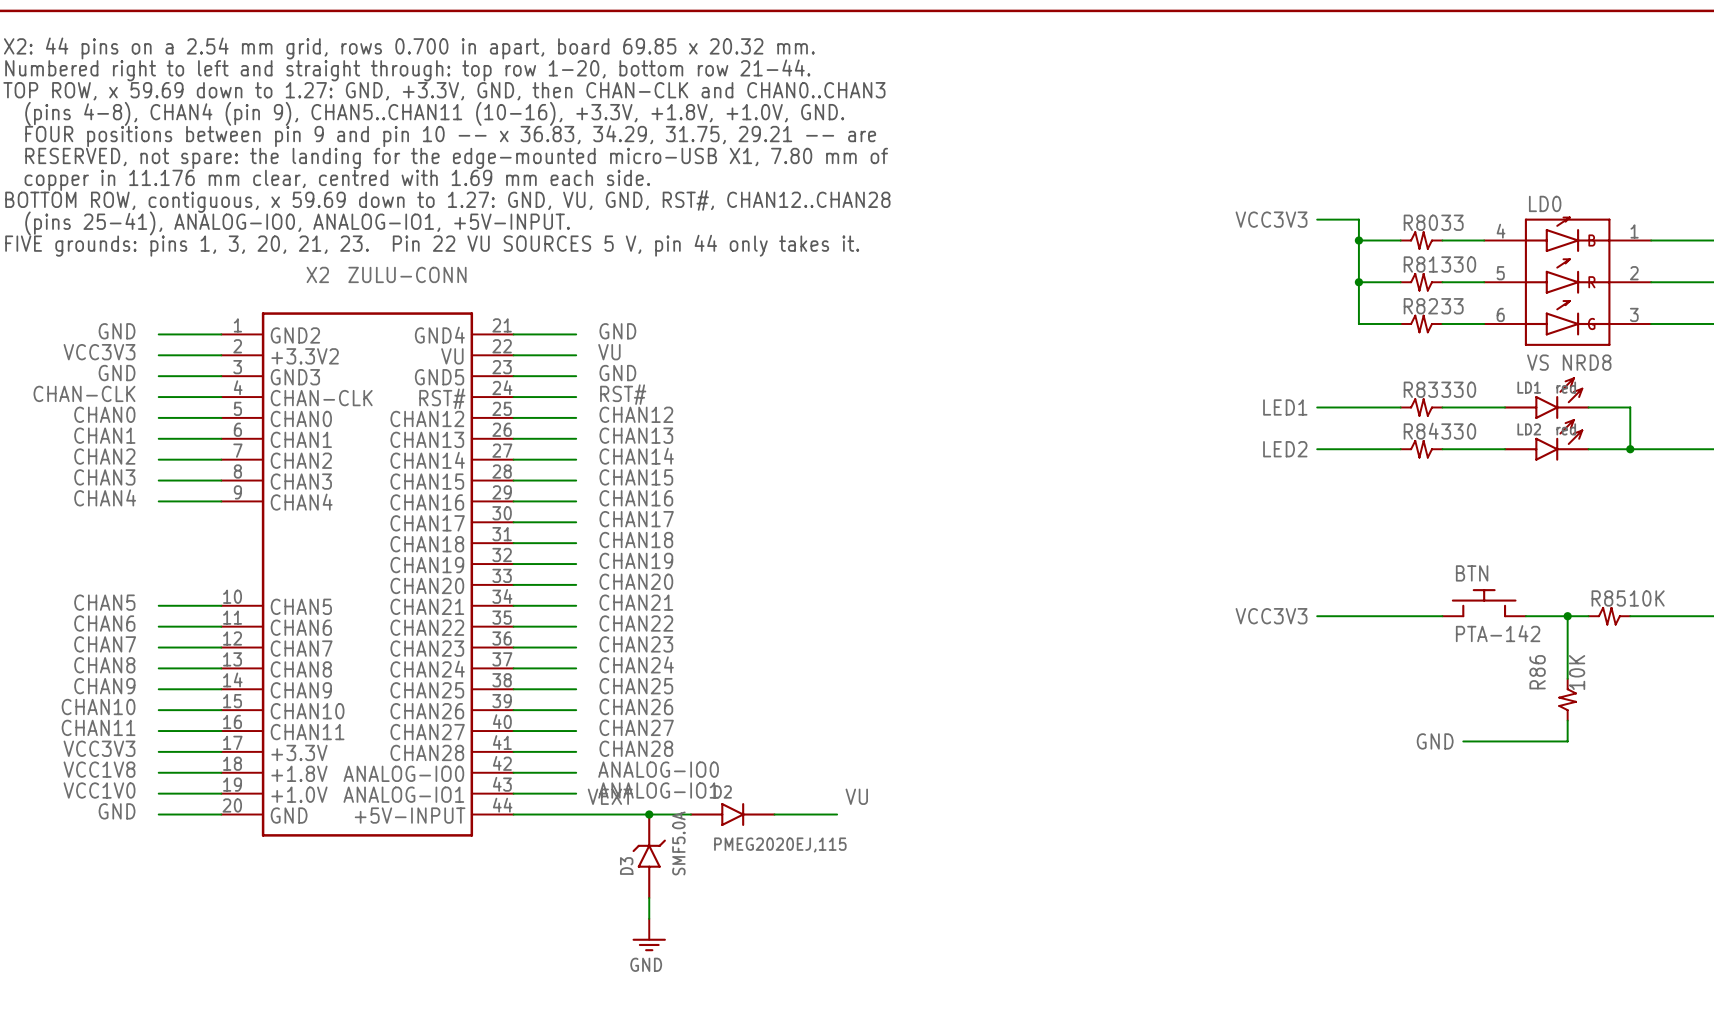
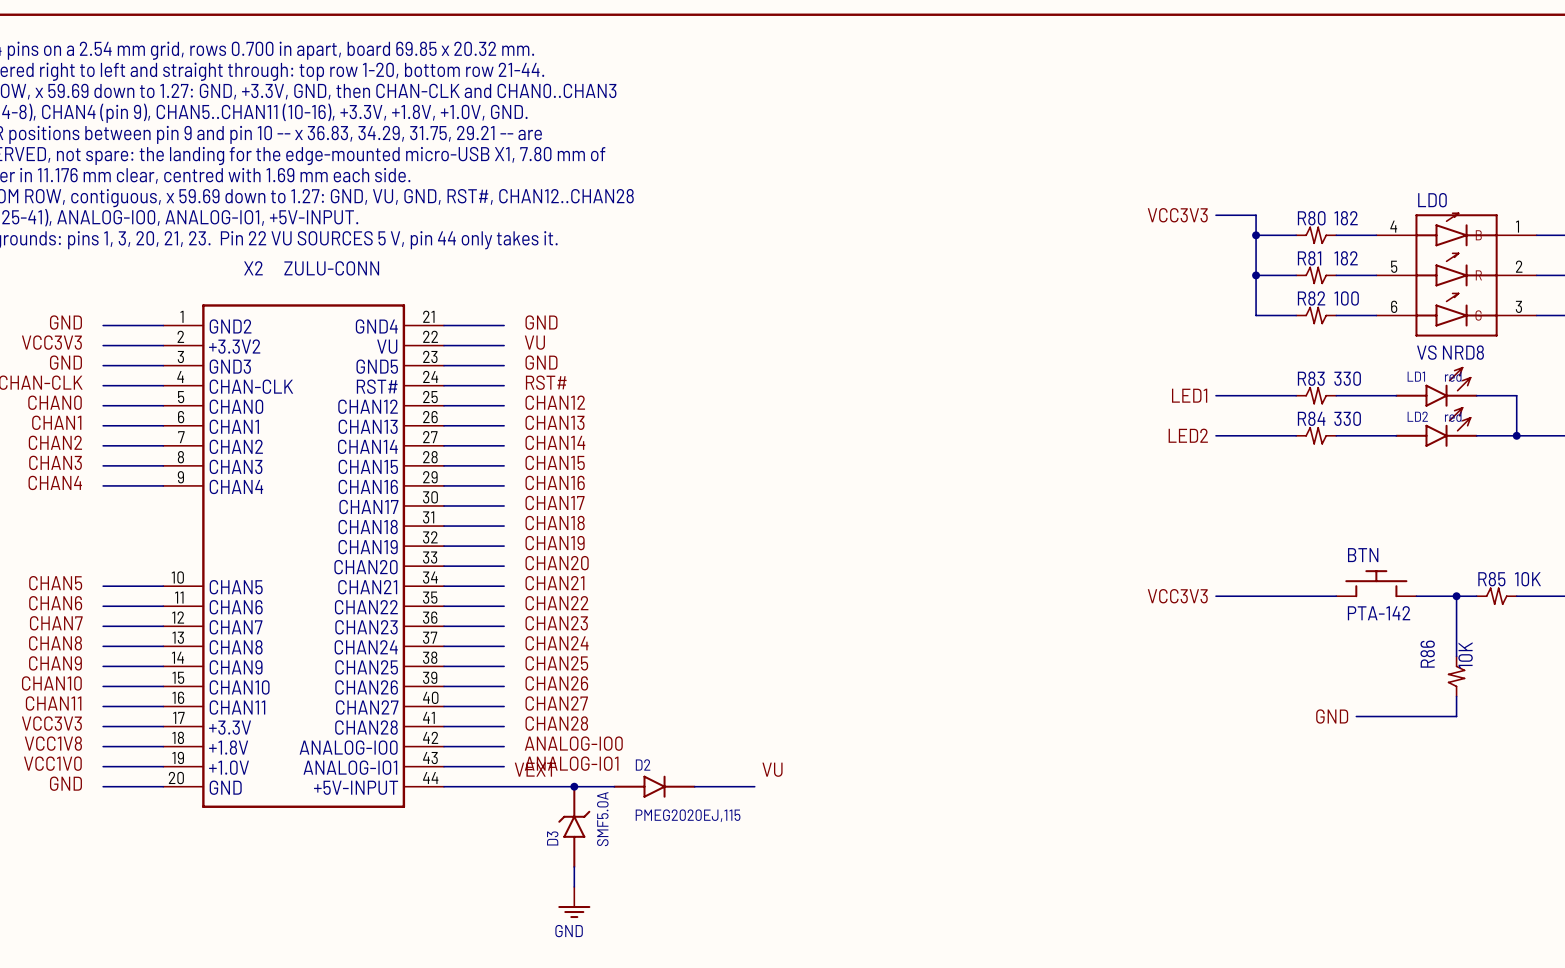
R80 value: 33 (1452, 222) -> 182 (1346, 218)
R81 value: 330 (1458, 264) -> 182 (1346, 258)
R82 value: 33 (1452, 306) -> 100 (1346, 298)

